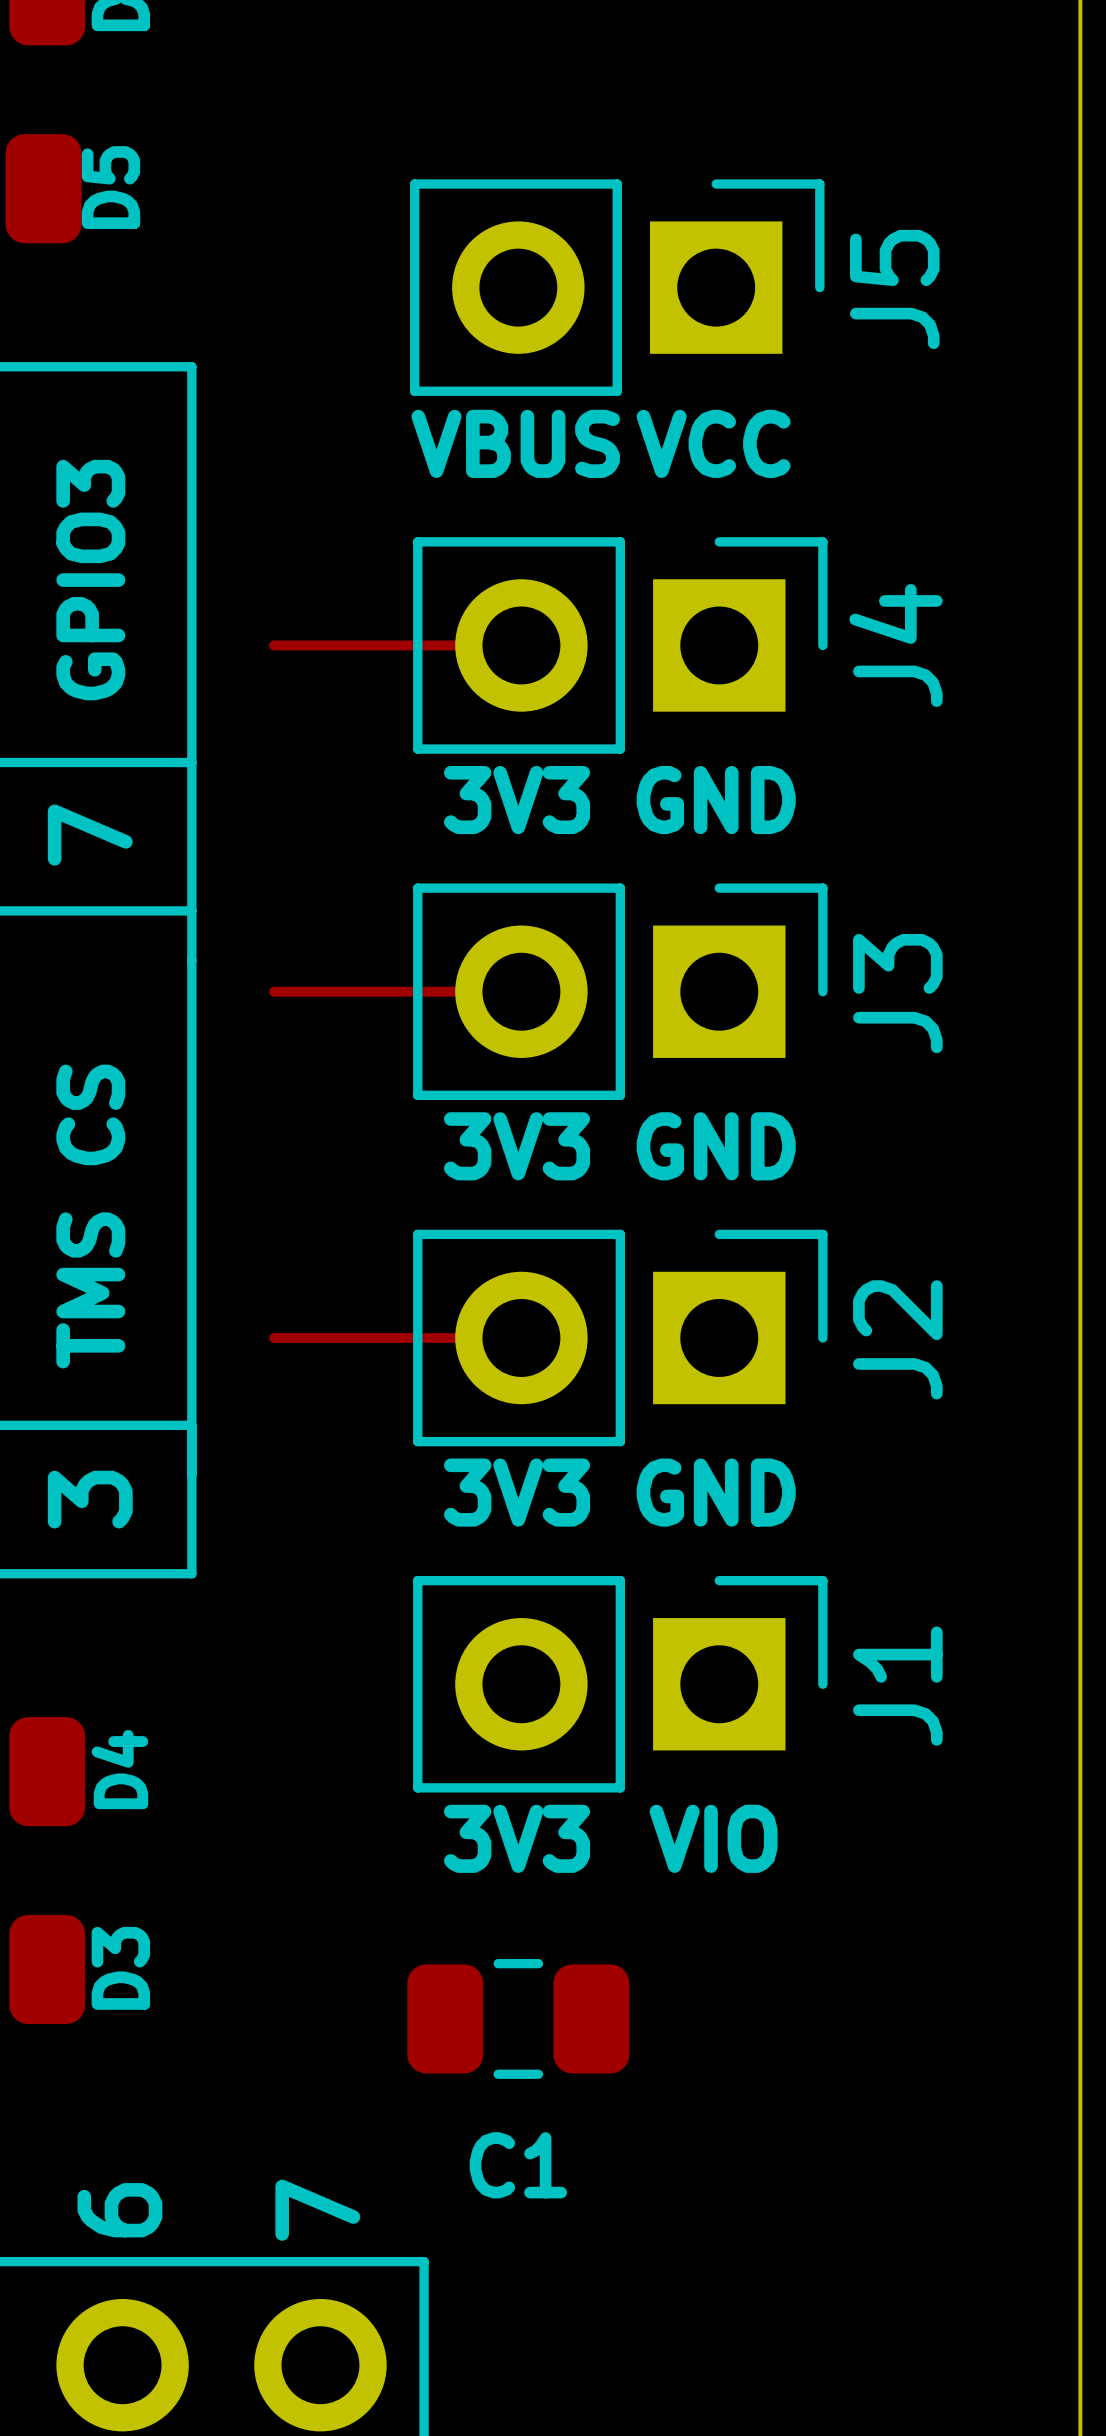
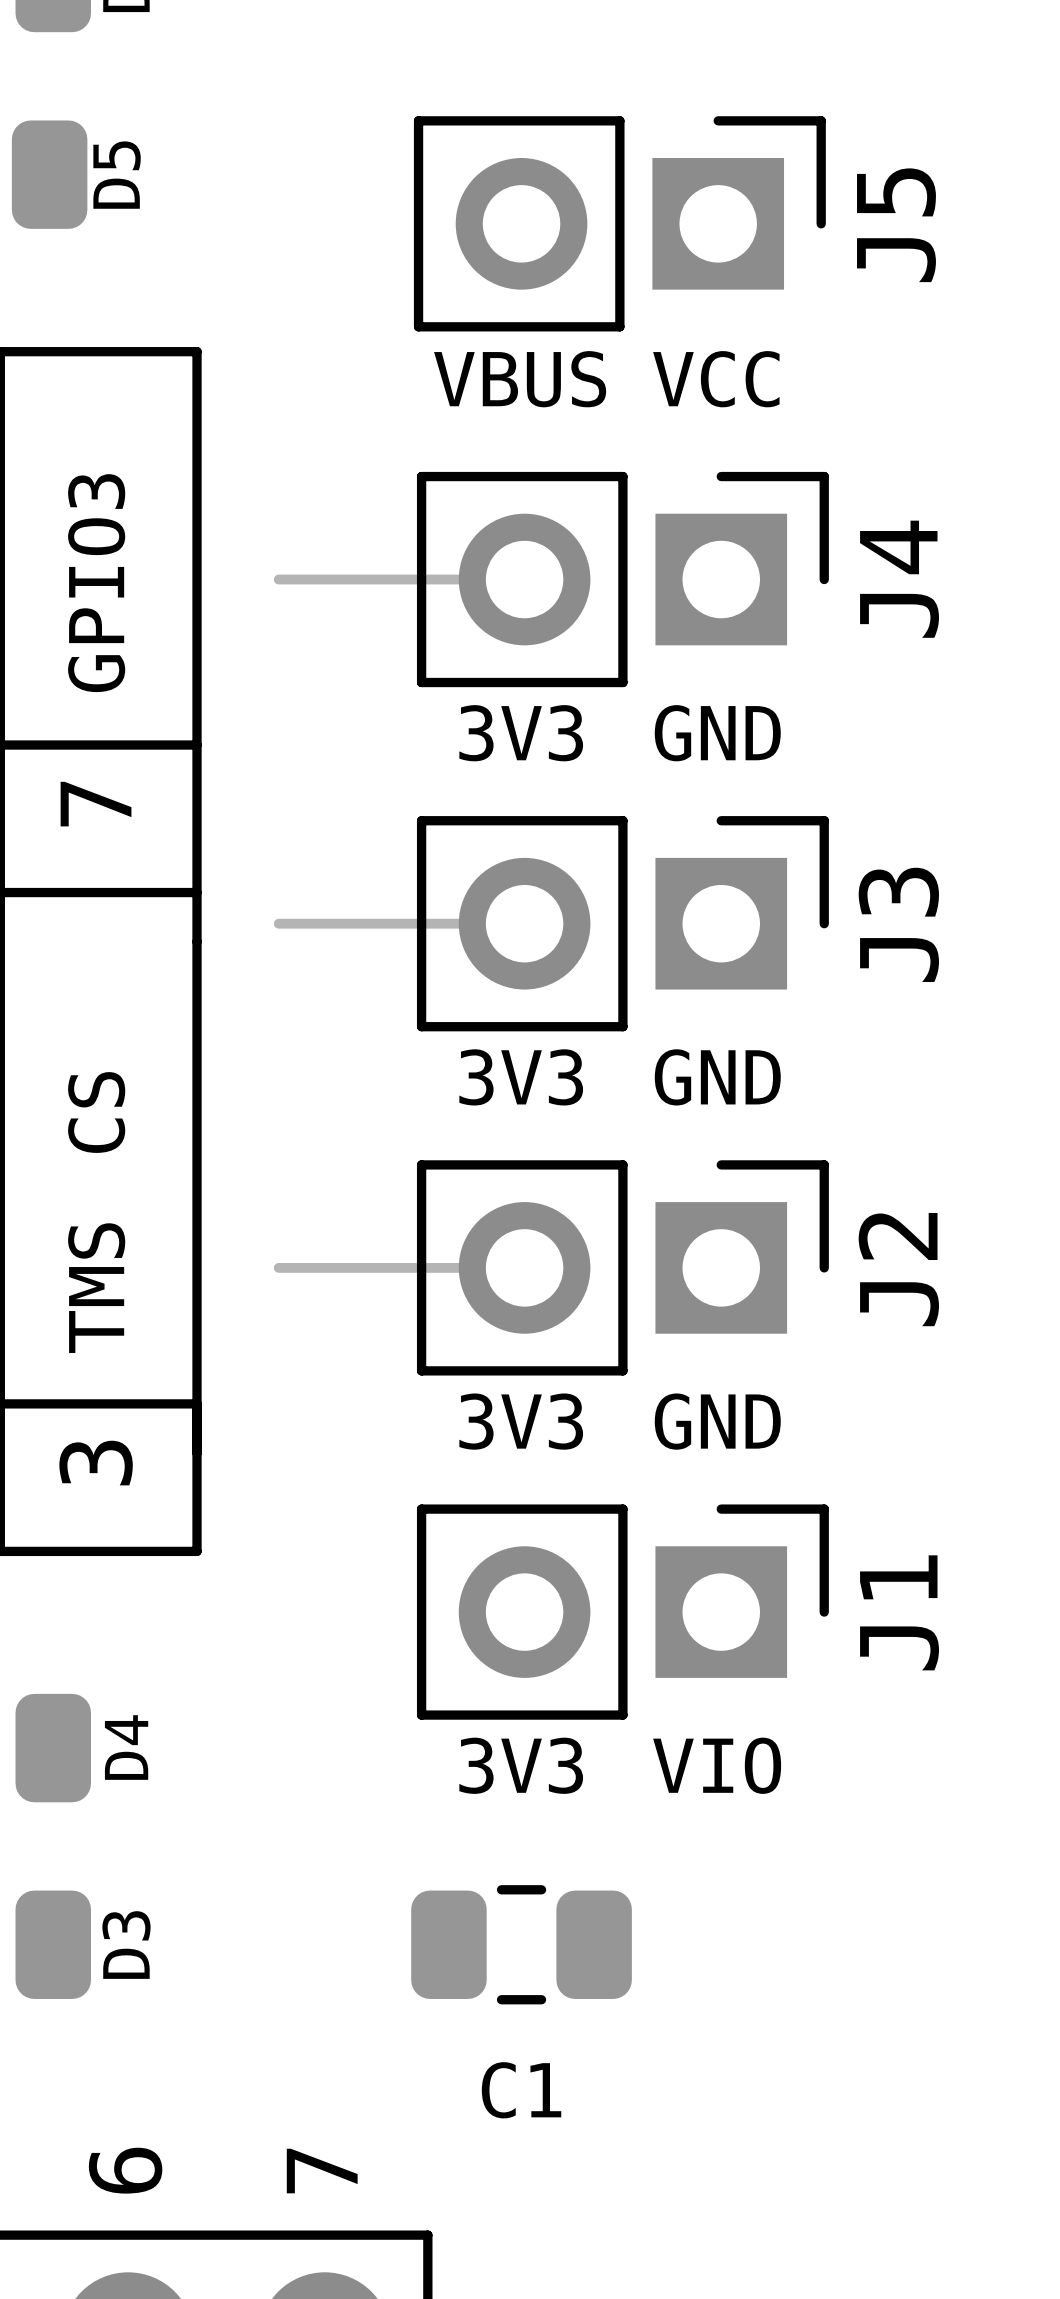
J5 position: (617, 287) -> (619, 223)
text position: VBUS (515, 443) -> VBUS (520, 379)
text position: VCC (713, 443) -> VCC (716, 379)
track: (274, 645) (521, 645) -> (278, 579) (524, 579)
J4 position: (620, 645) -> (622, 579)
text position: 3V3 (517, 800) -> 3V3 (521, 733)
text position: GND (716, 800) -> GND (717, 733)
track: (274, 991) (521, 991) -> (278, 923) (524, 923)
J3 position: (620, 991) -> (622, 923)
text position: 3V3 (517, 1146) -> 3V3 (521, 1077)
text position: GND (716, 1146) -> GND (717, 1077)
track: (274, 1337) (521, 1337) -> (278, 1267) (524, 1267)
J2 position: (620, 1337) -> (622, 1267)
text position: 3V3 (517, 1492) -> 3V3 (521, 1421)
text position: GND (716, 1492) -> GND (717, 1421)
J1 position: (620, 1684) -> (622, 1612)
text position: 3V3 (517, 1838) -> 3V3 (521, 1765)
text position: VIO (713, 1838) -> VIO (717, 1765)
C1 position: (518, 2018) -> (521, 1944)

